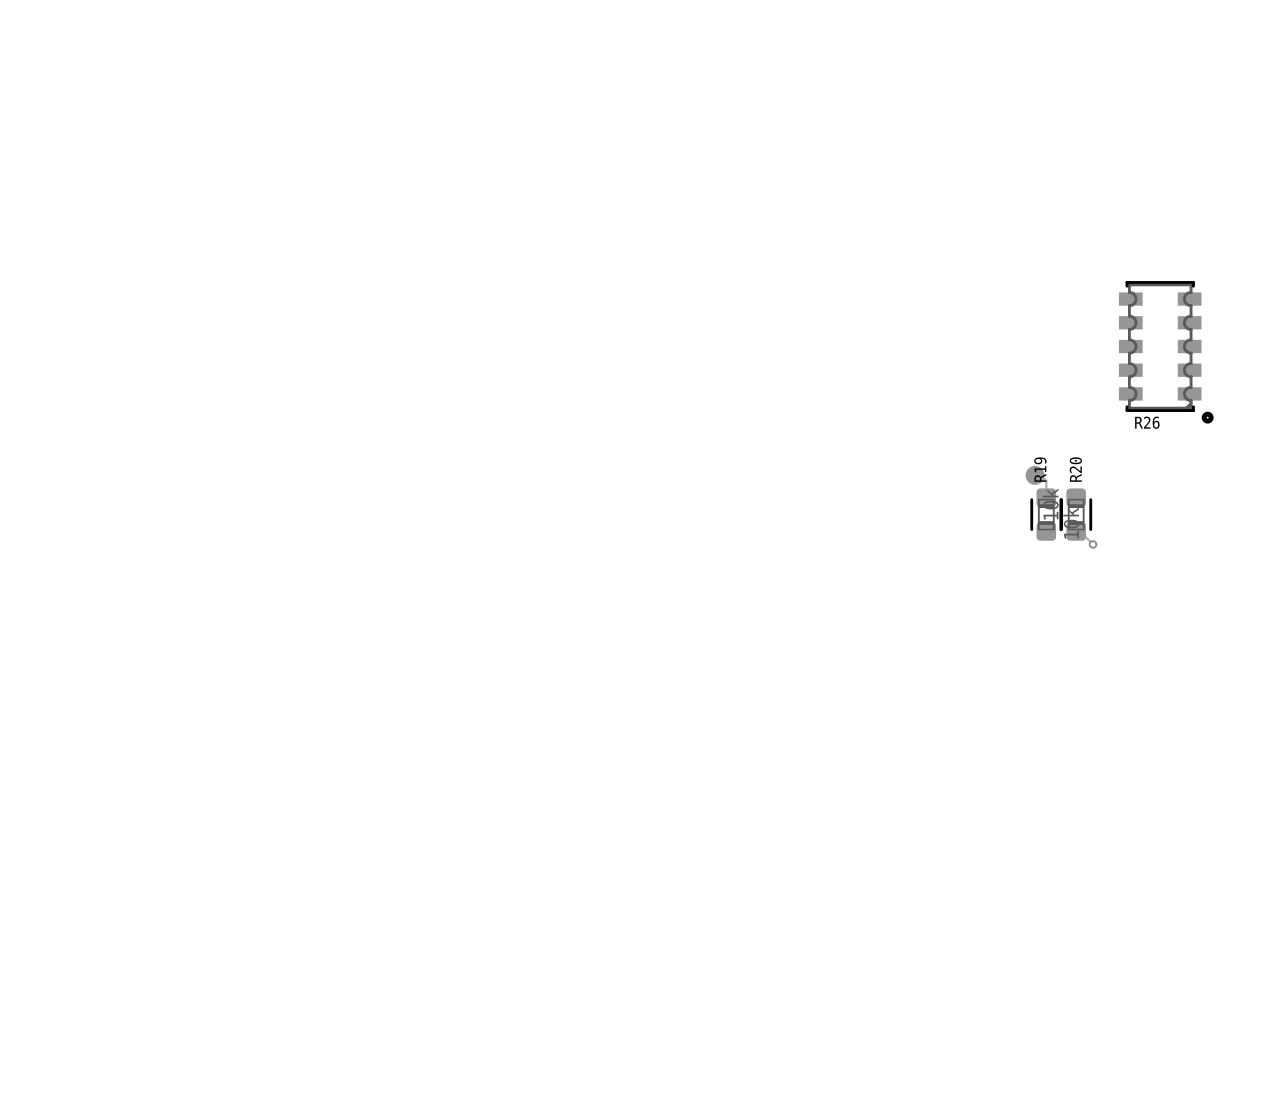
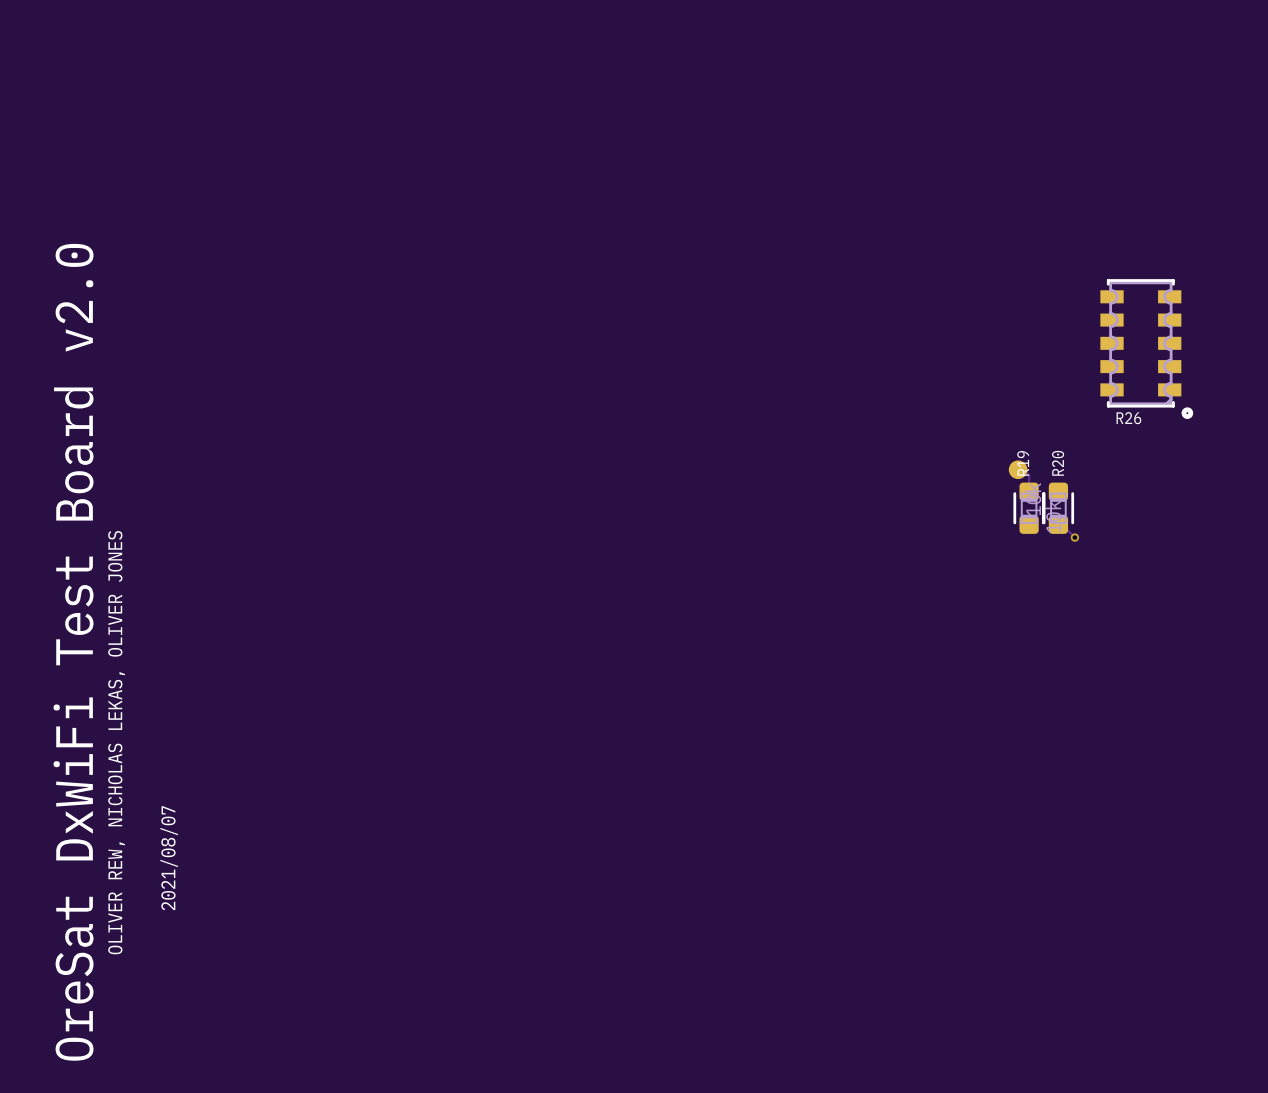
text: none -> OreSat DxWiFi Test Board v2.0 (73, 652)
text: none -> OLIVER REW, NICHOLAS LEKAS, OLIVER JONES (116, 742)
text: none -> 2021/08/07 (169, 858)

